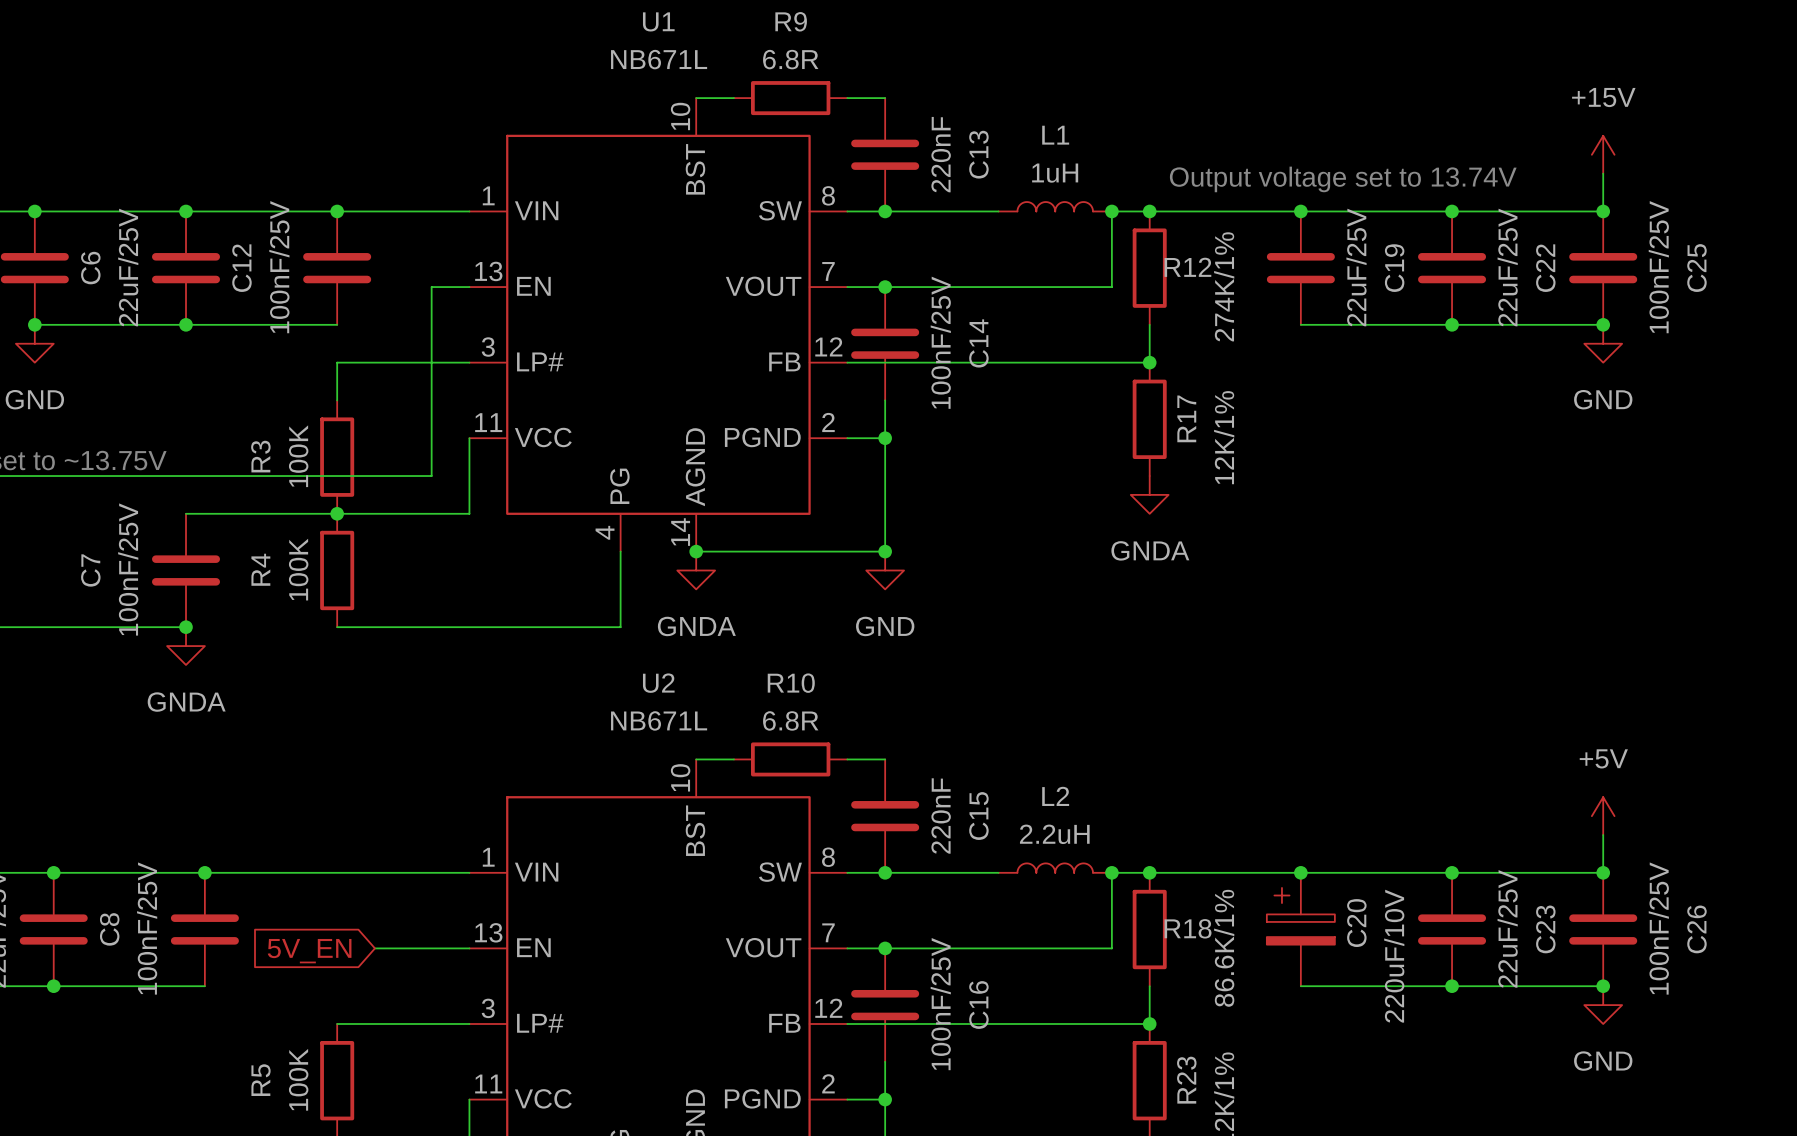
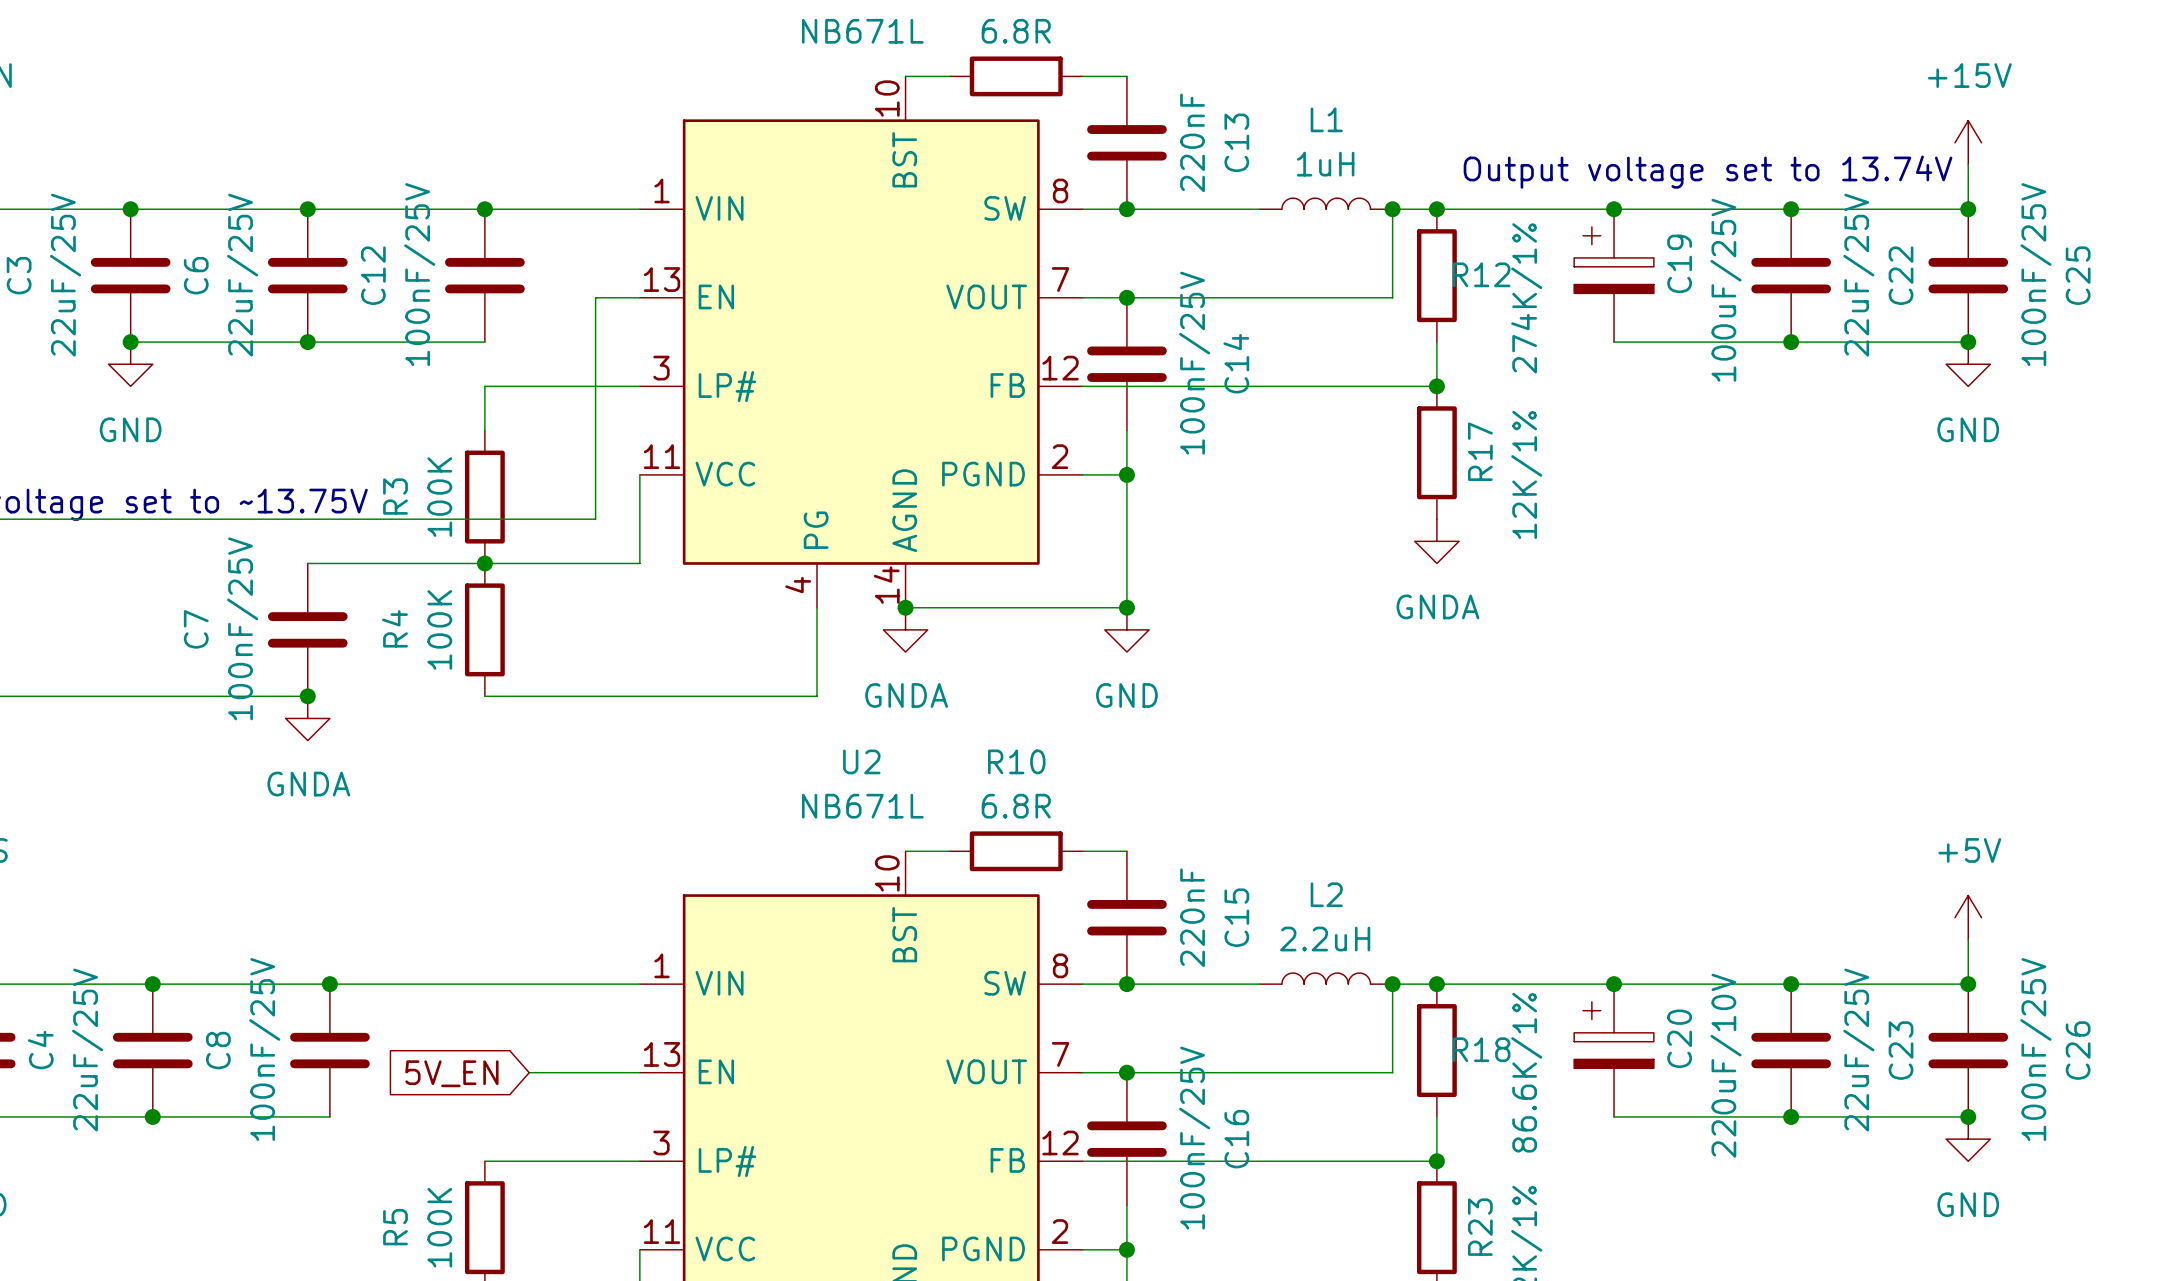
C19 symbol: [1266, 211, 1335, 325] -> [1574, 209, 1654, 343]
C19 value: 22uF/25V (1356, 267) -> 100uF/25V (1726, 290)
C19 name position: C19 (1394, 268) -> C19 (1679, 263)

